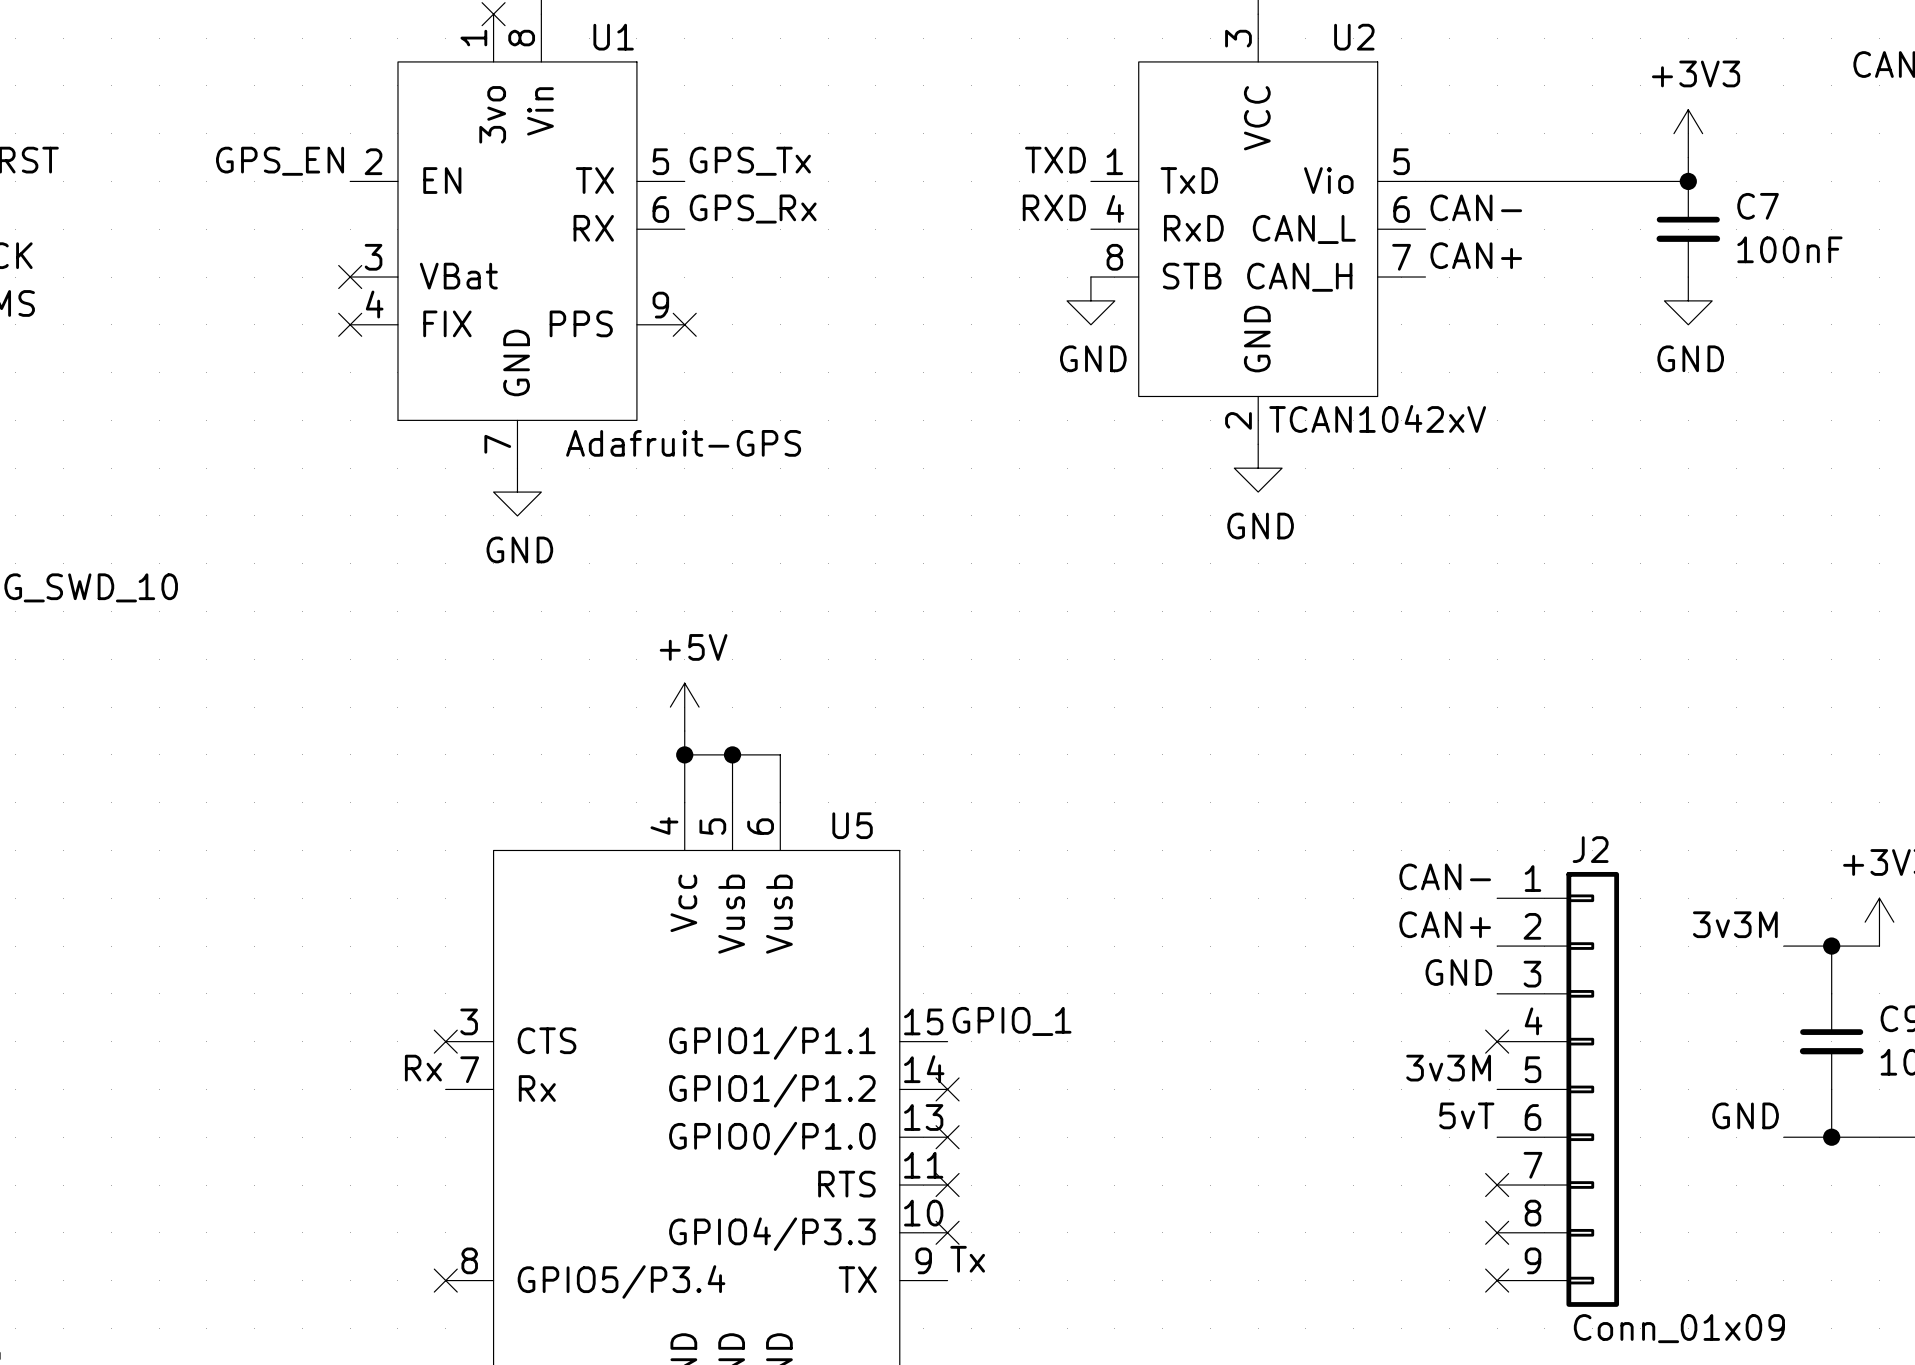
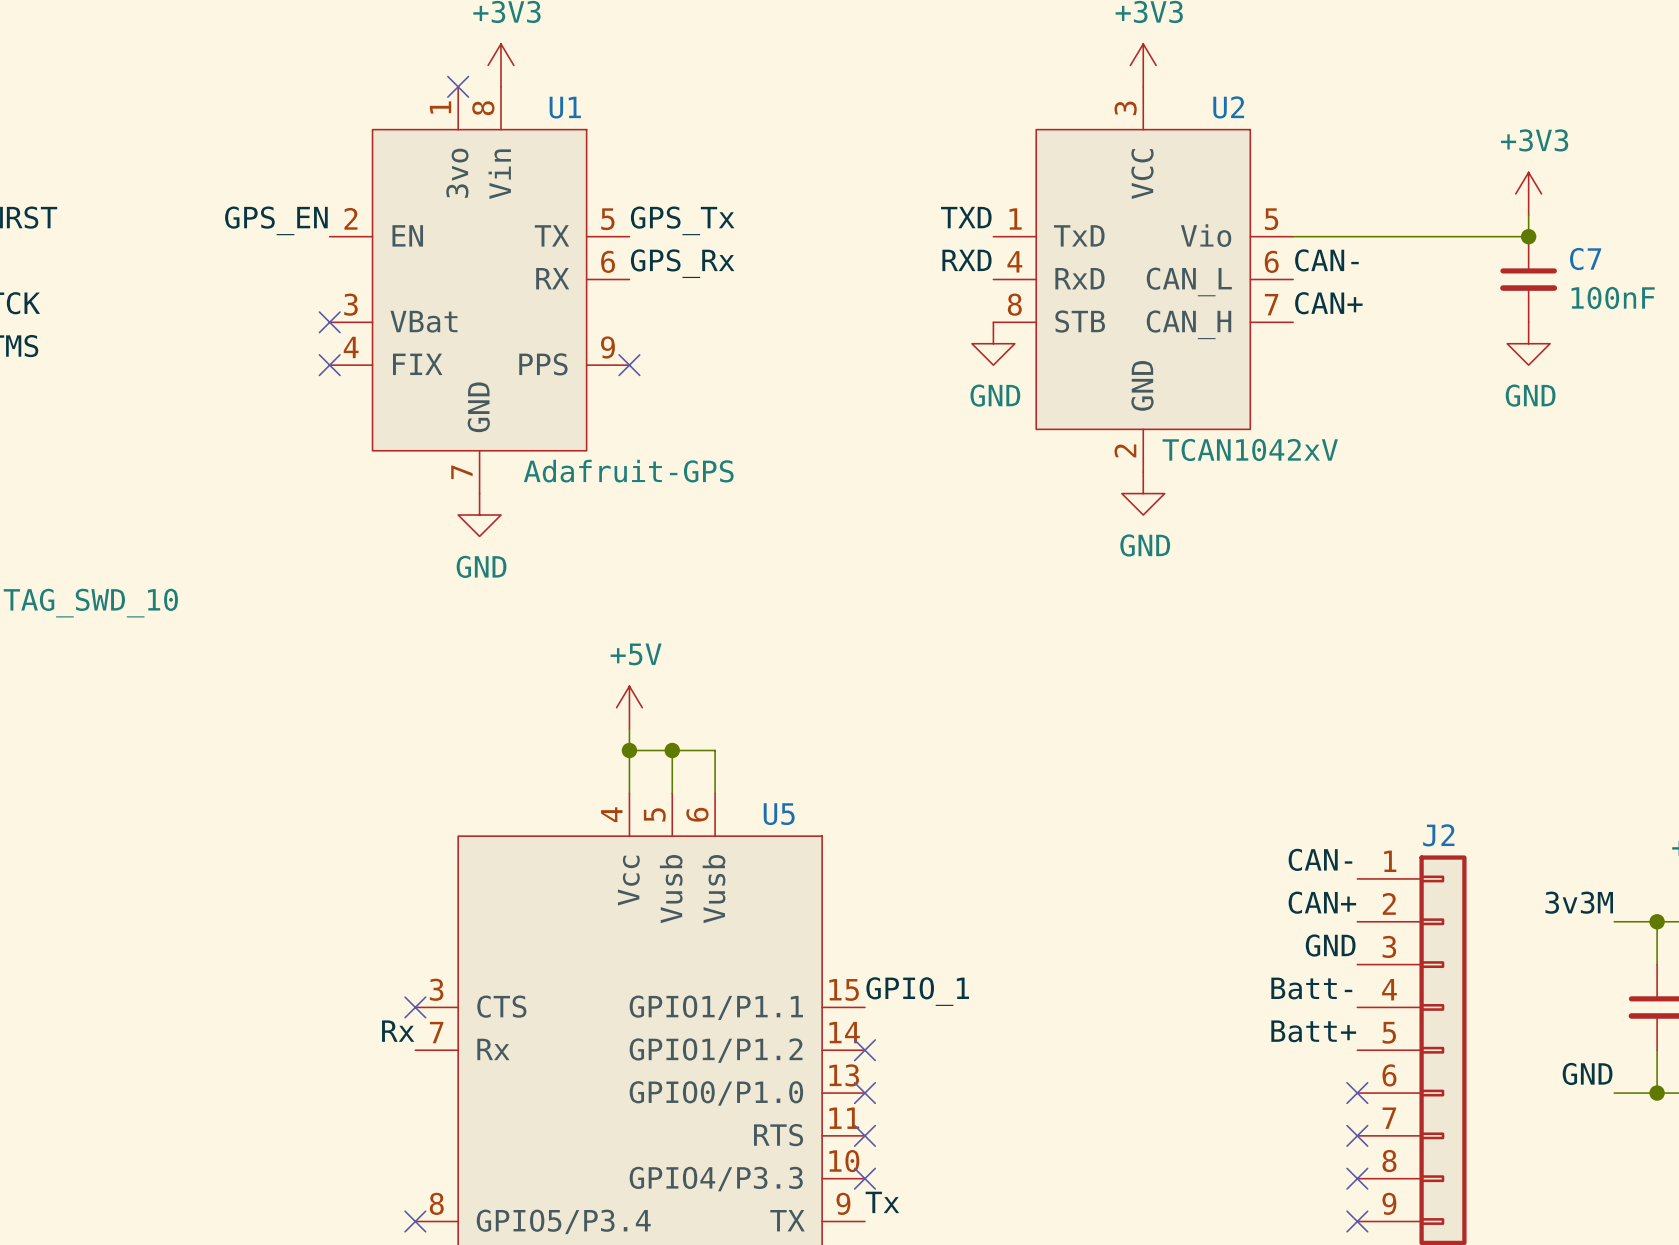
label: none -> Batt- (1311, 988)
no-connect mark position: (1497, 1041) -> (1357, 1093)
label: 3v3M (1448, 1068) -> Batt+ (1313, 1031)
label: 5vT (1466, 1115) -> none

